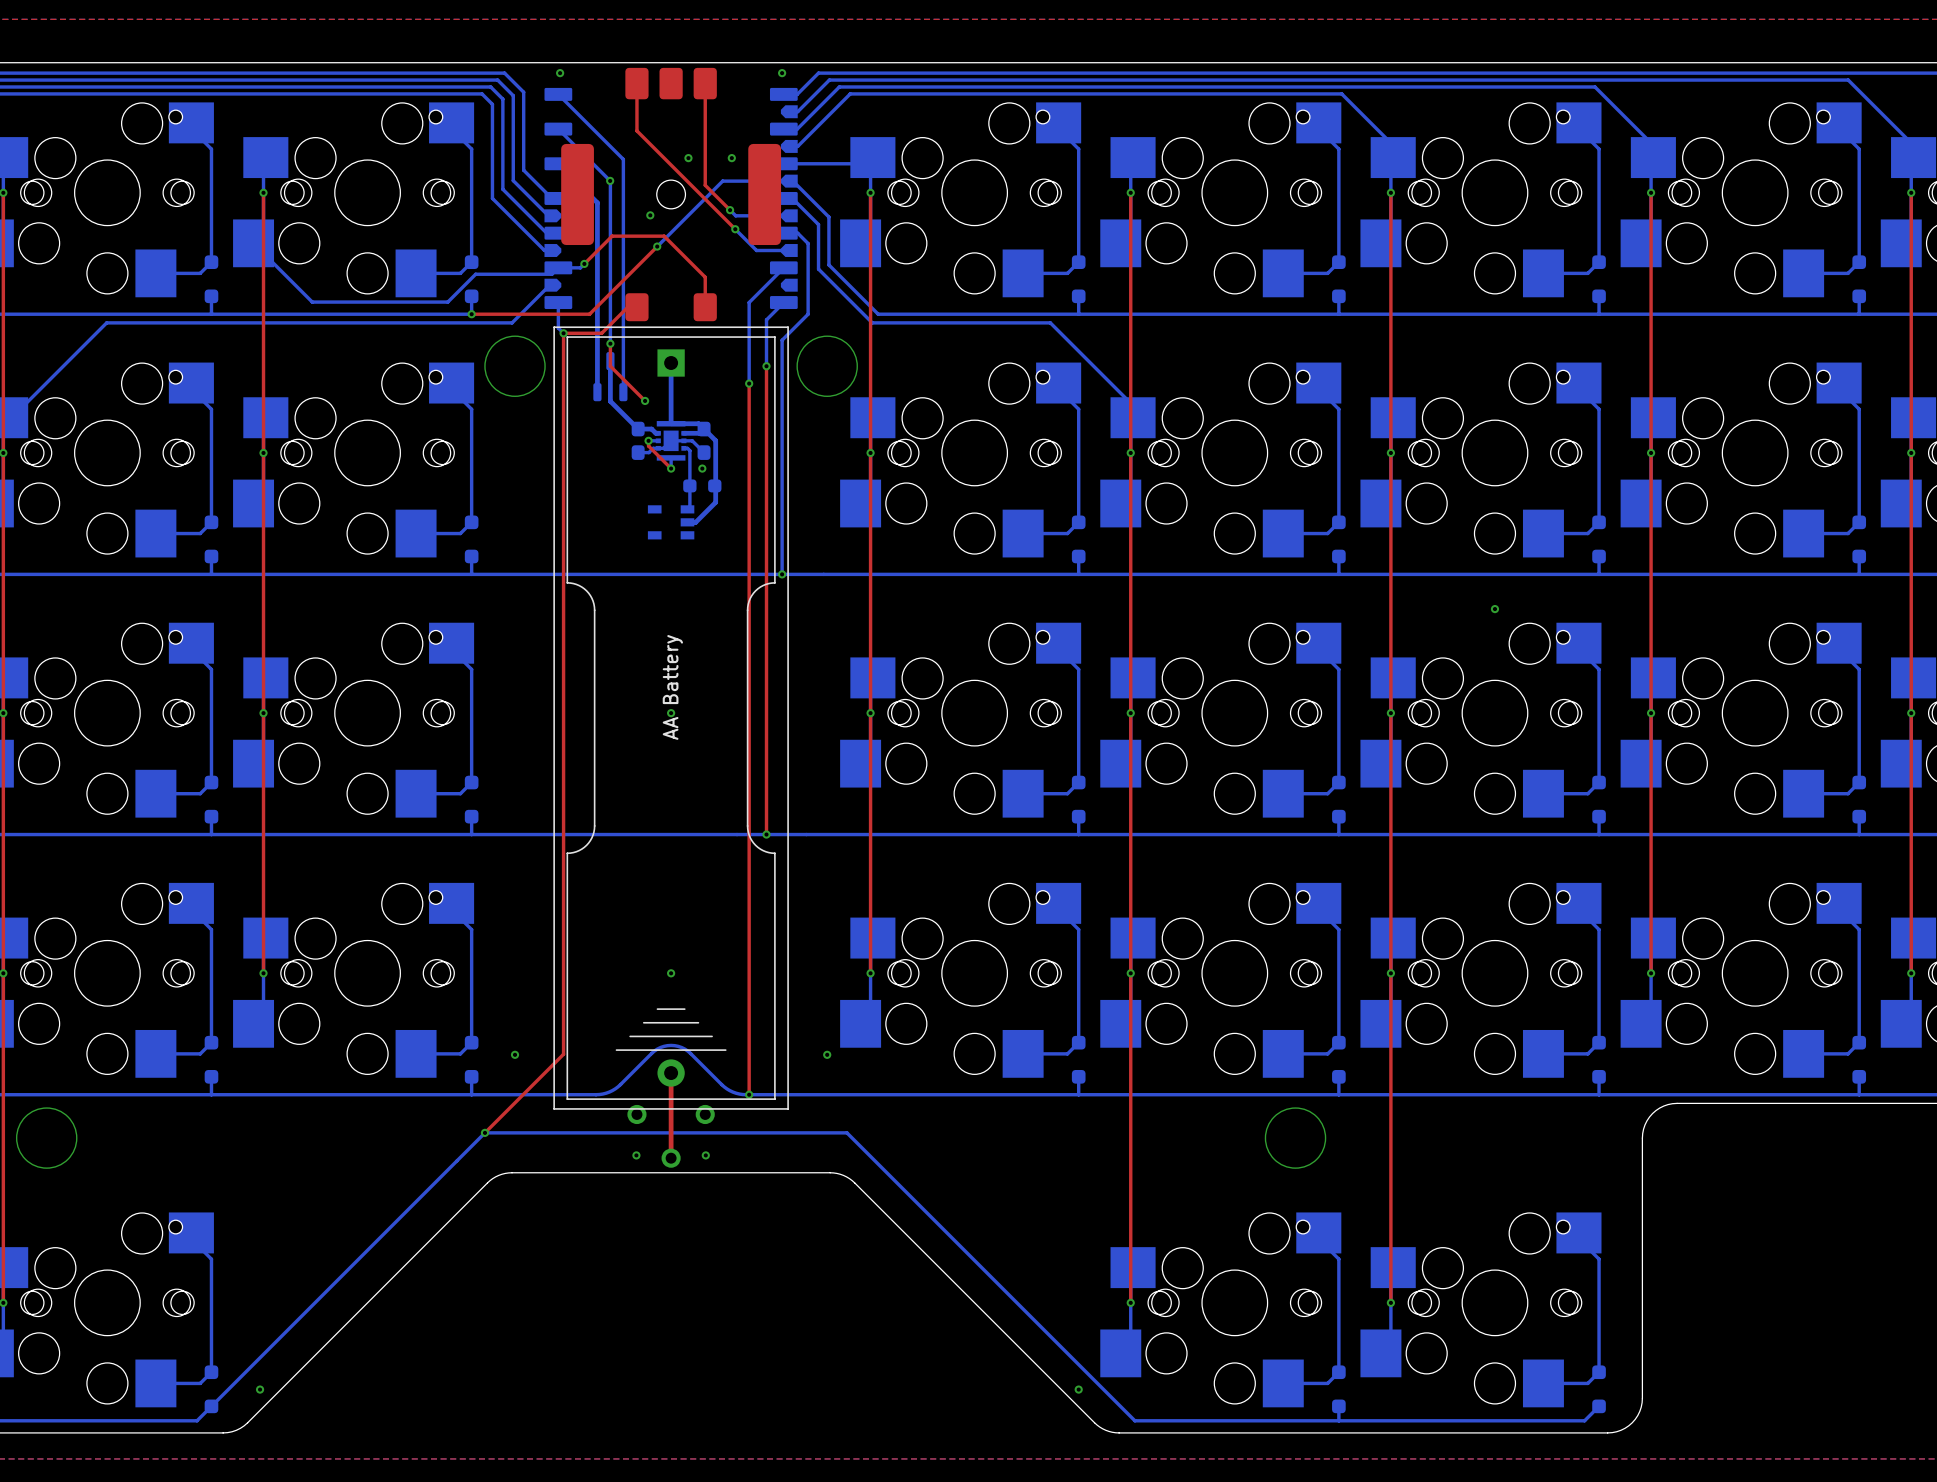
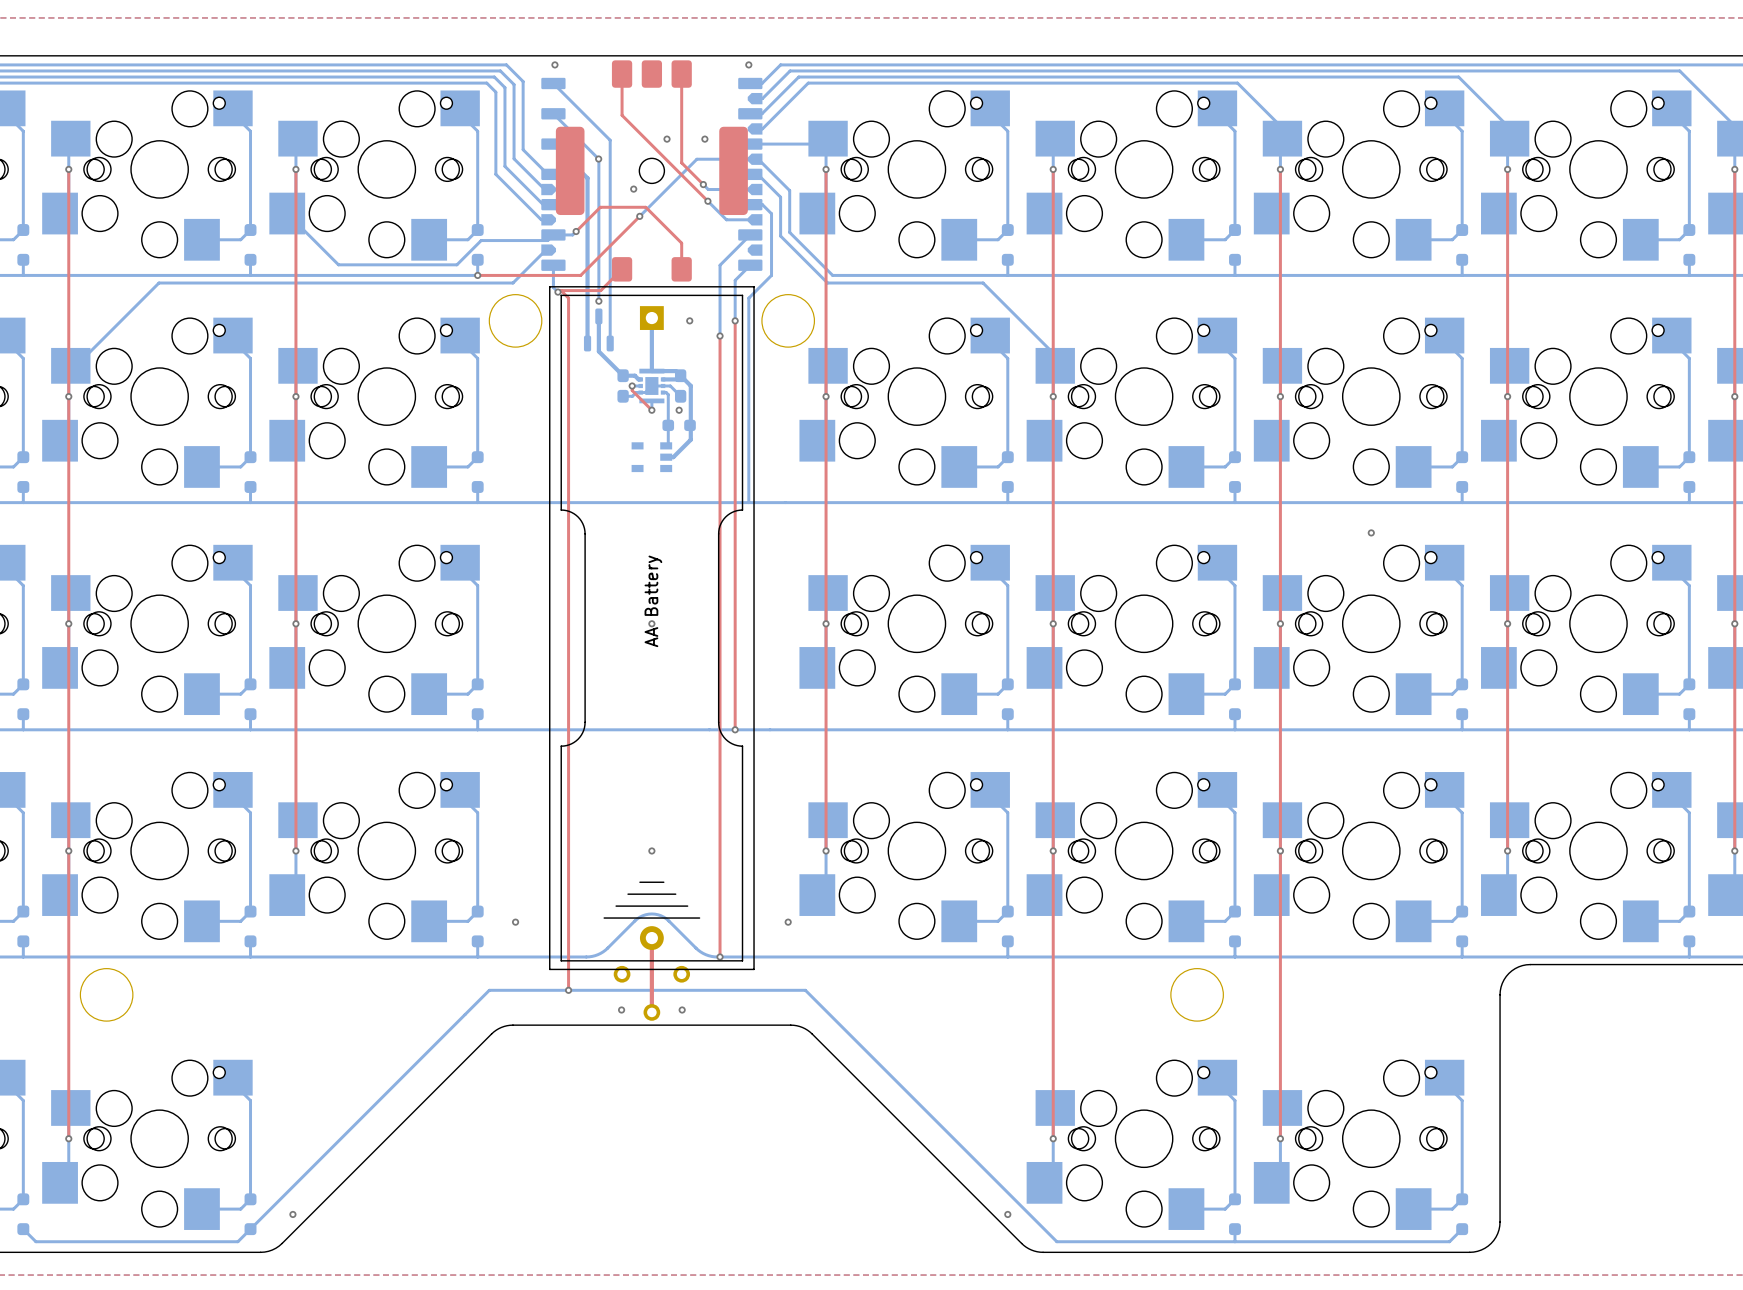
top track: (636, 307) (627, 307) (601, 333) (563, 333) (563, 1054) (484, 1132) -> (622, 269) (600, 290) (561, 290) (568, 298) (568, 990)
top track: (610, 343) (610, 366) (645, 400) -> none
via position: (645, 400) -> (689, 320)
via: (782, 574) -> none
via: (484, 1132) -> none
via: none -> (568, 990)

